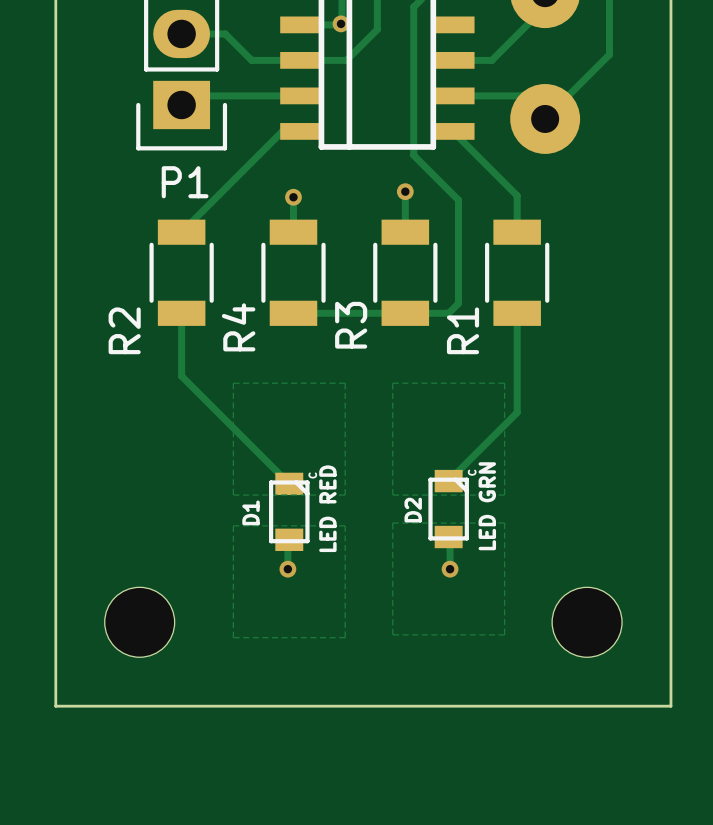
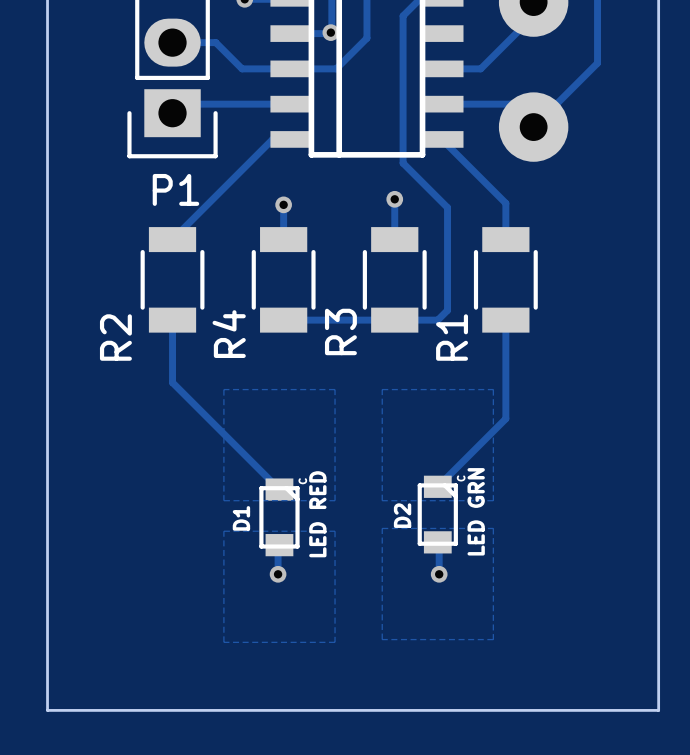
part: (139, 622) -> none
part: (587, 622) -> none

